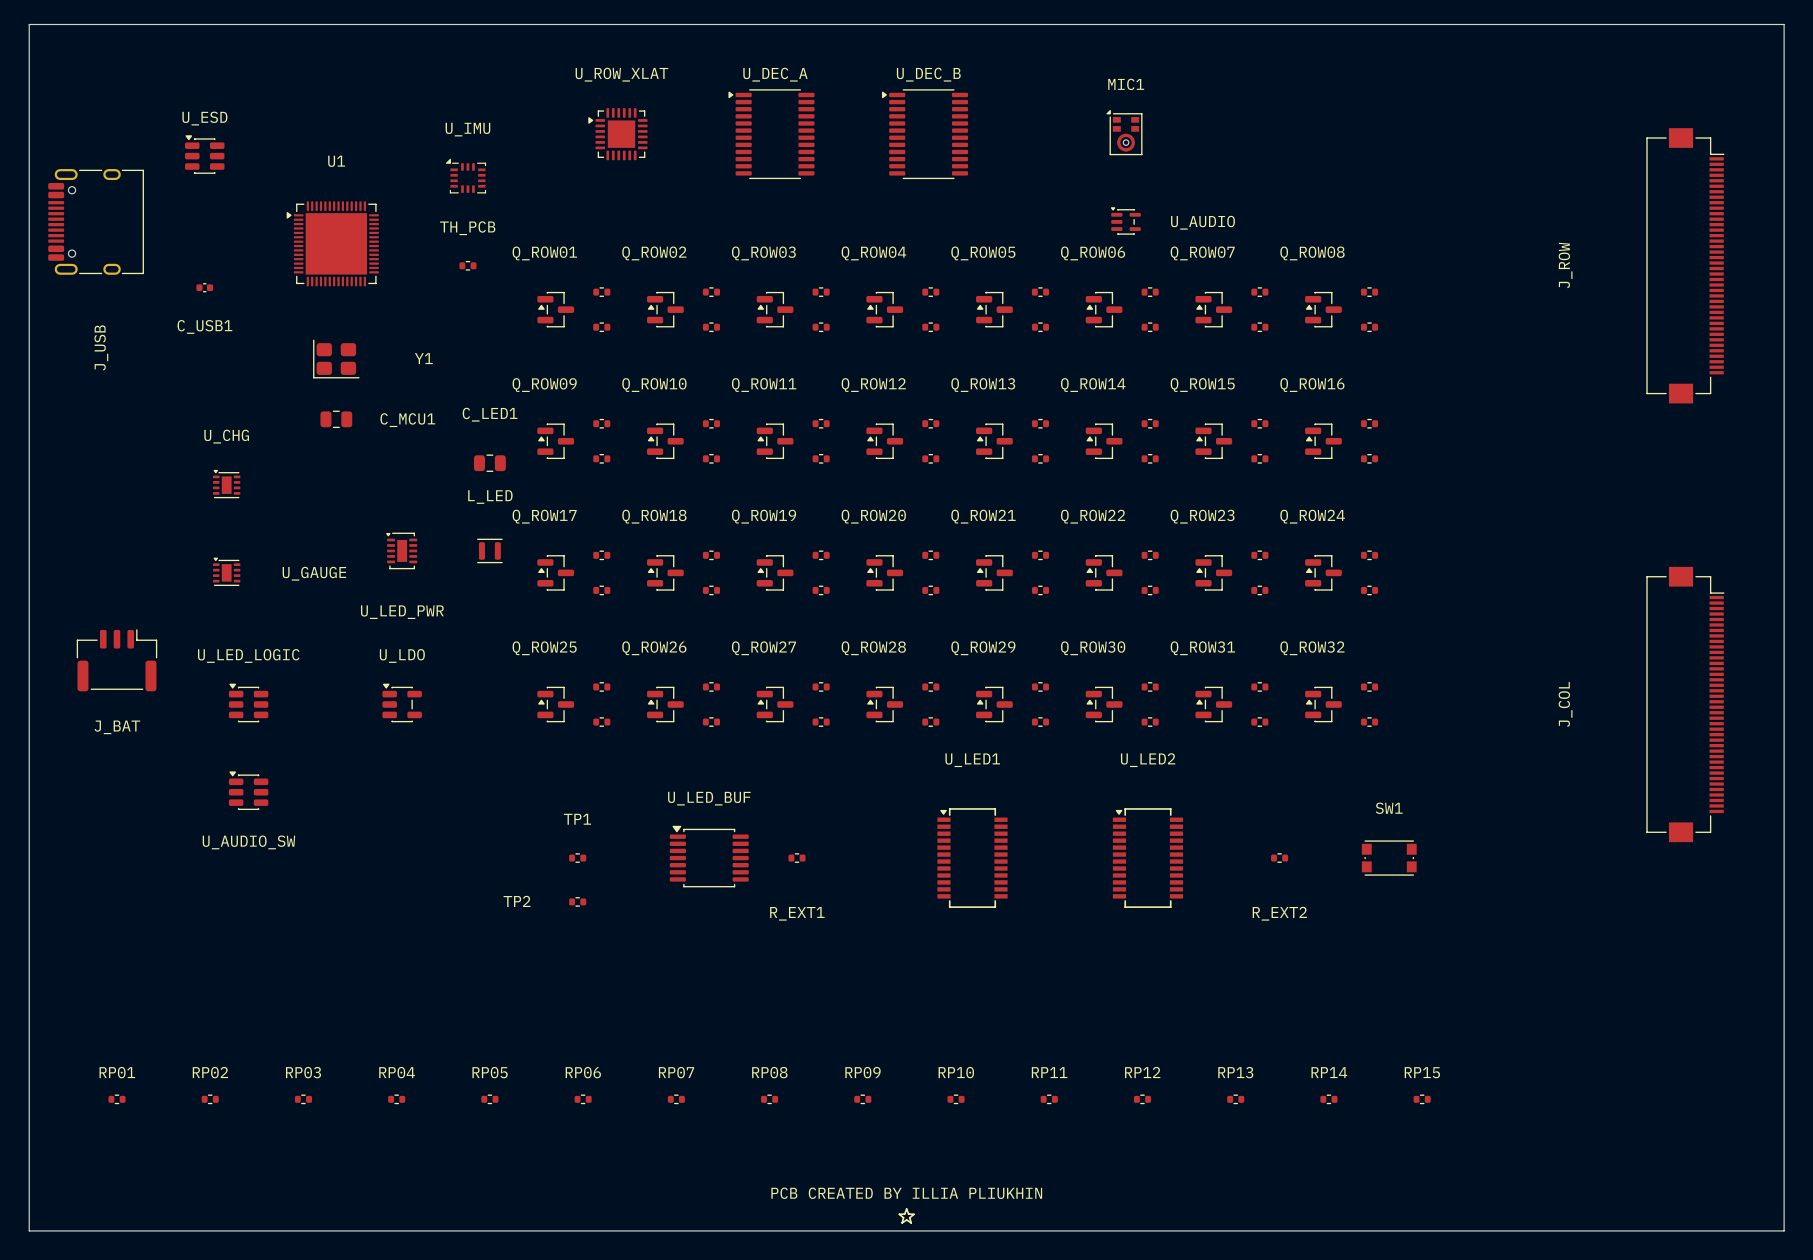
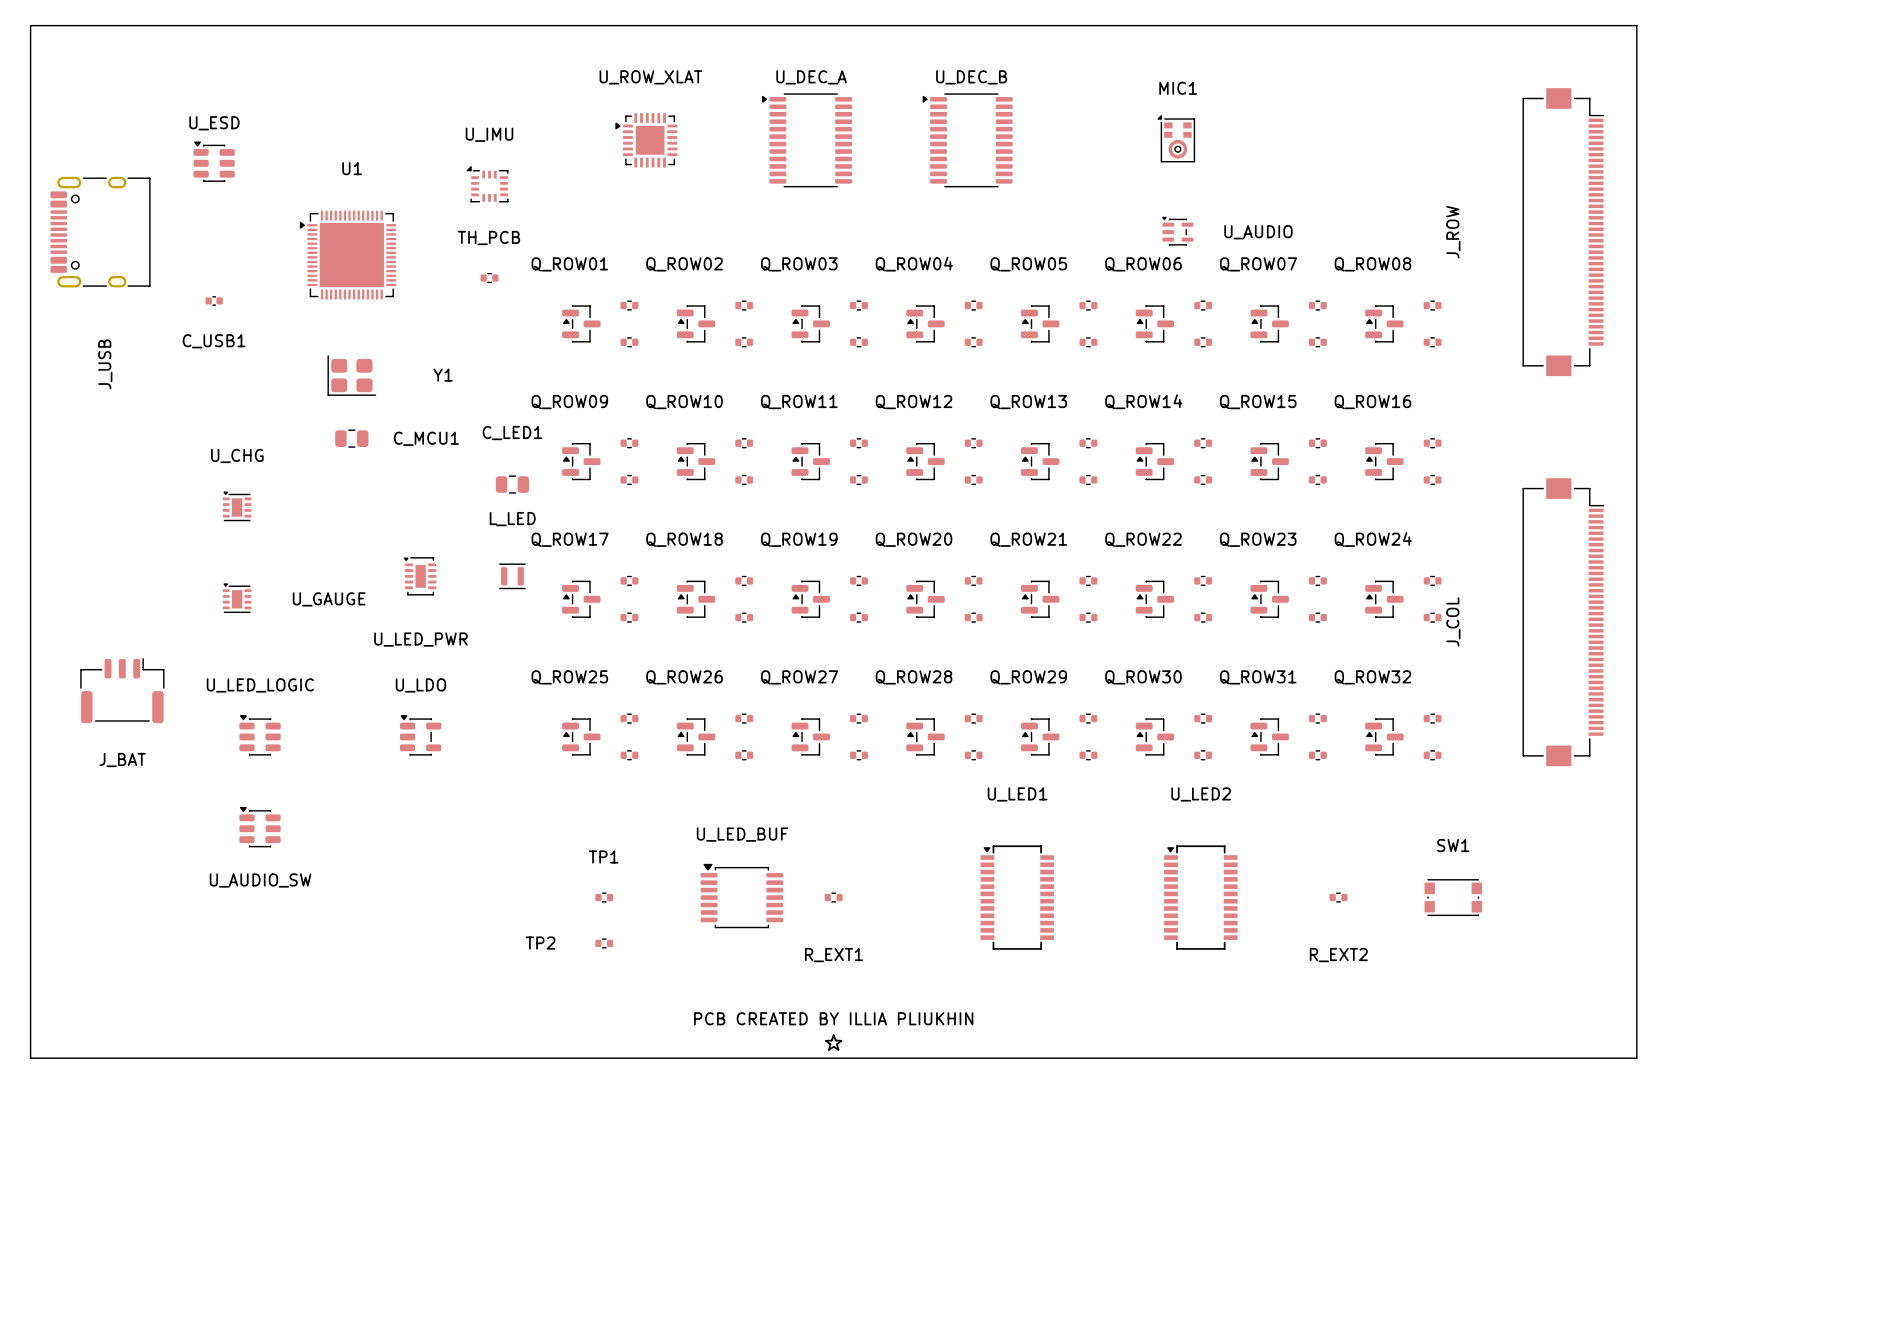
board edge: (1564, 24) (1784, 24) (1784, 1230) (29, 1230) (29, 1011) -> (1636, 25) (1636, 1058) (30, 1058)
J_ROW name position: J_ROW (1565, 265) -> J_ROW (1453, 232)
J_ROW position: (1685, 265) -> (1563, 232)
J_COL name position: J_COL (1565, 704) -> J_COL (1453, 621)
J_COL position: (1685, 704) -> (1563, 622)
RP01: (116, 1099) -> none
RP02: (210, 1099) -> none
RP03: (303, 1099) -> none
RP04: (396, 1099) -> none
RP05: (489, 1099) -> none
RP06: (583, 1099) -> none
RP07: (676, 1099) -> none
RP08: (769, 1099) -> none
RP09: (862, 1099) -> none
RP10: (956, 1099) -> none
RP11: (1049, 1099) -> none
RP12: (1142, 1099) -> none
RP13: (1235, 1099) -> none
RP14: (1328, 1099) -> none
RP15: (1422, 1099) -> none
text position: PCB CREATED BY ILLIA PLIUKHIN (906, 1193) -> PCB CREATED BY ILLIA PLIUKHIN (833, 1018)
line: (906, 1209) (904, 1214) (899, 1214) (903, 1217) (902, 1222) (906, 1219) (911, 1222) (909, 1217) (913, 1214) (908, 1214) (906, 1209) -> (833, 1035) (831, 1040) (826, 1040) (830, 1044) (828, 1049) (833, 1046) (838, 1049) (836, 1044) (841, 1040) (835, 1040) (833, 1035)

